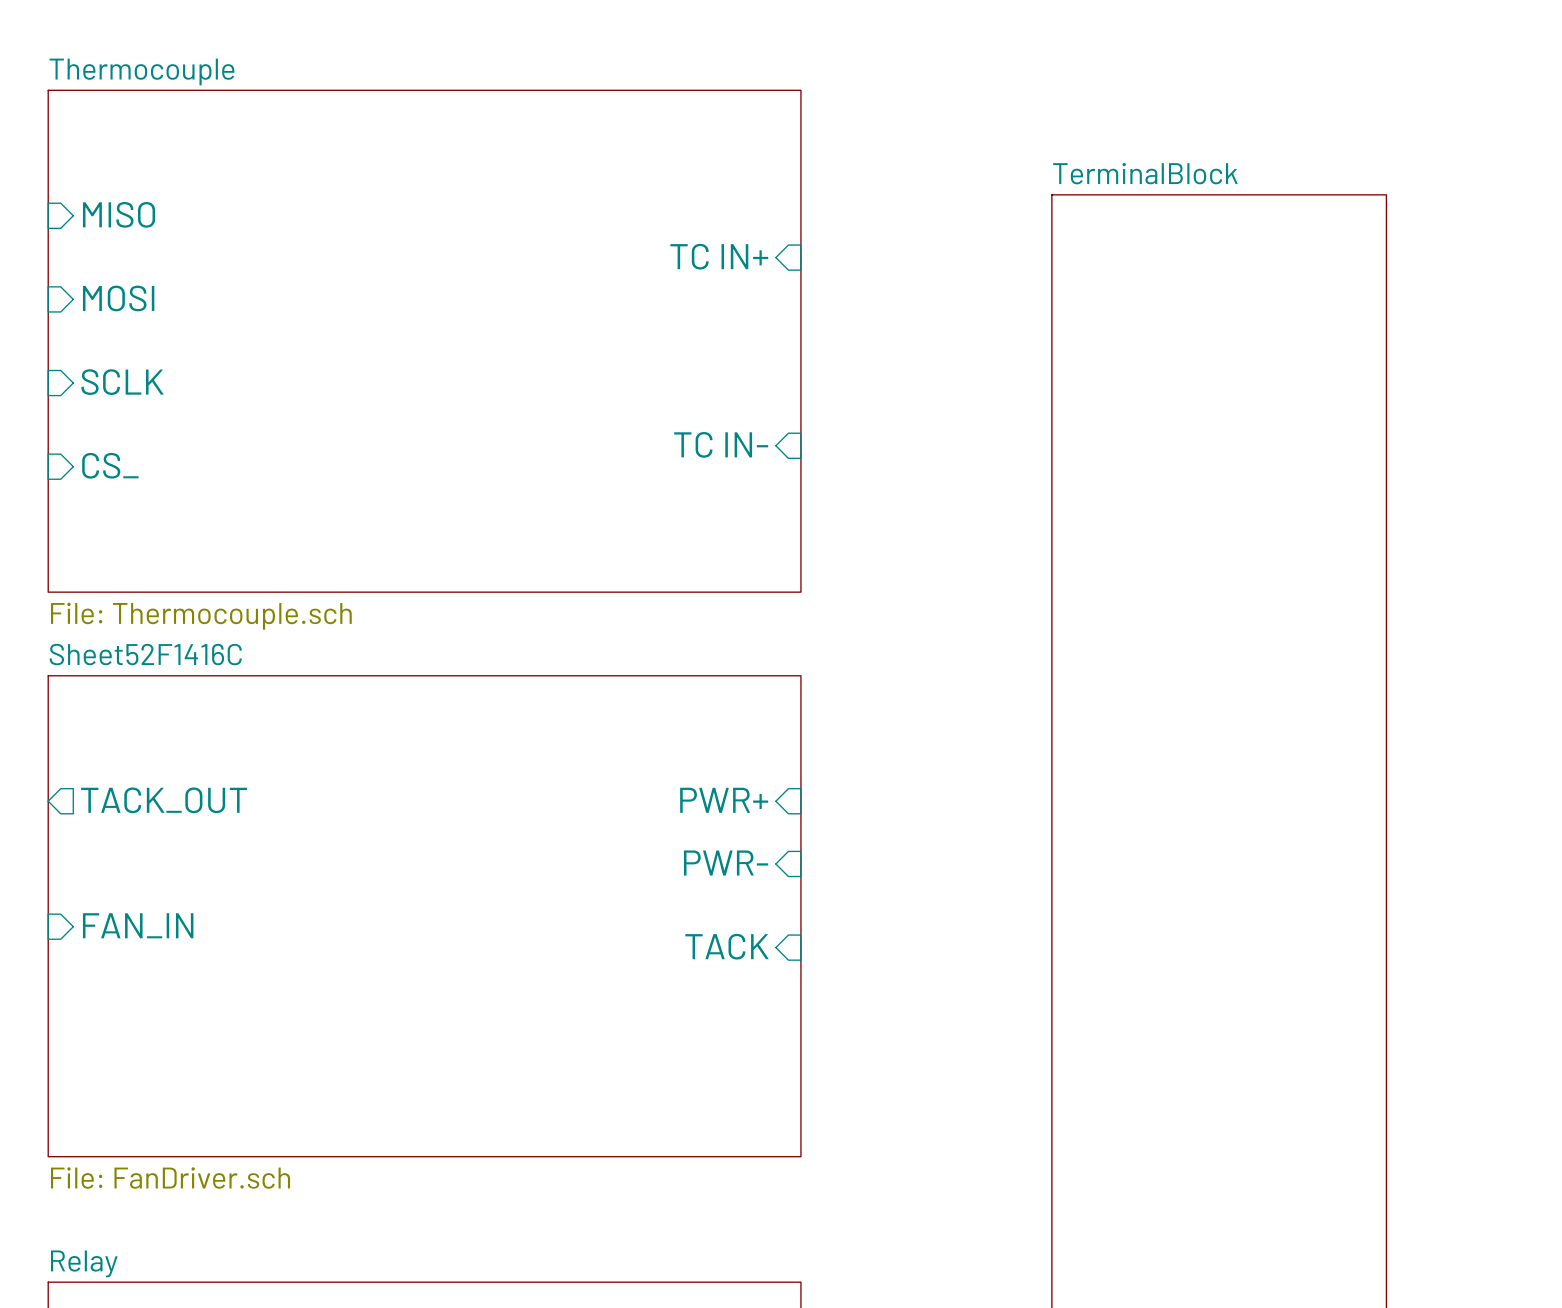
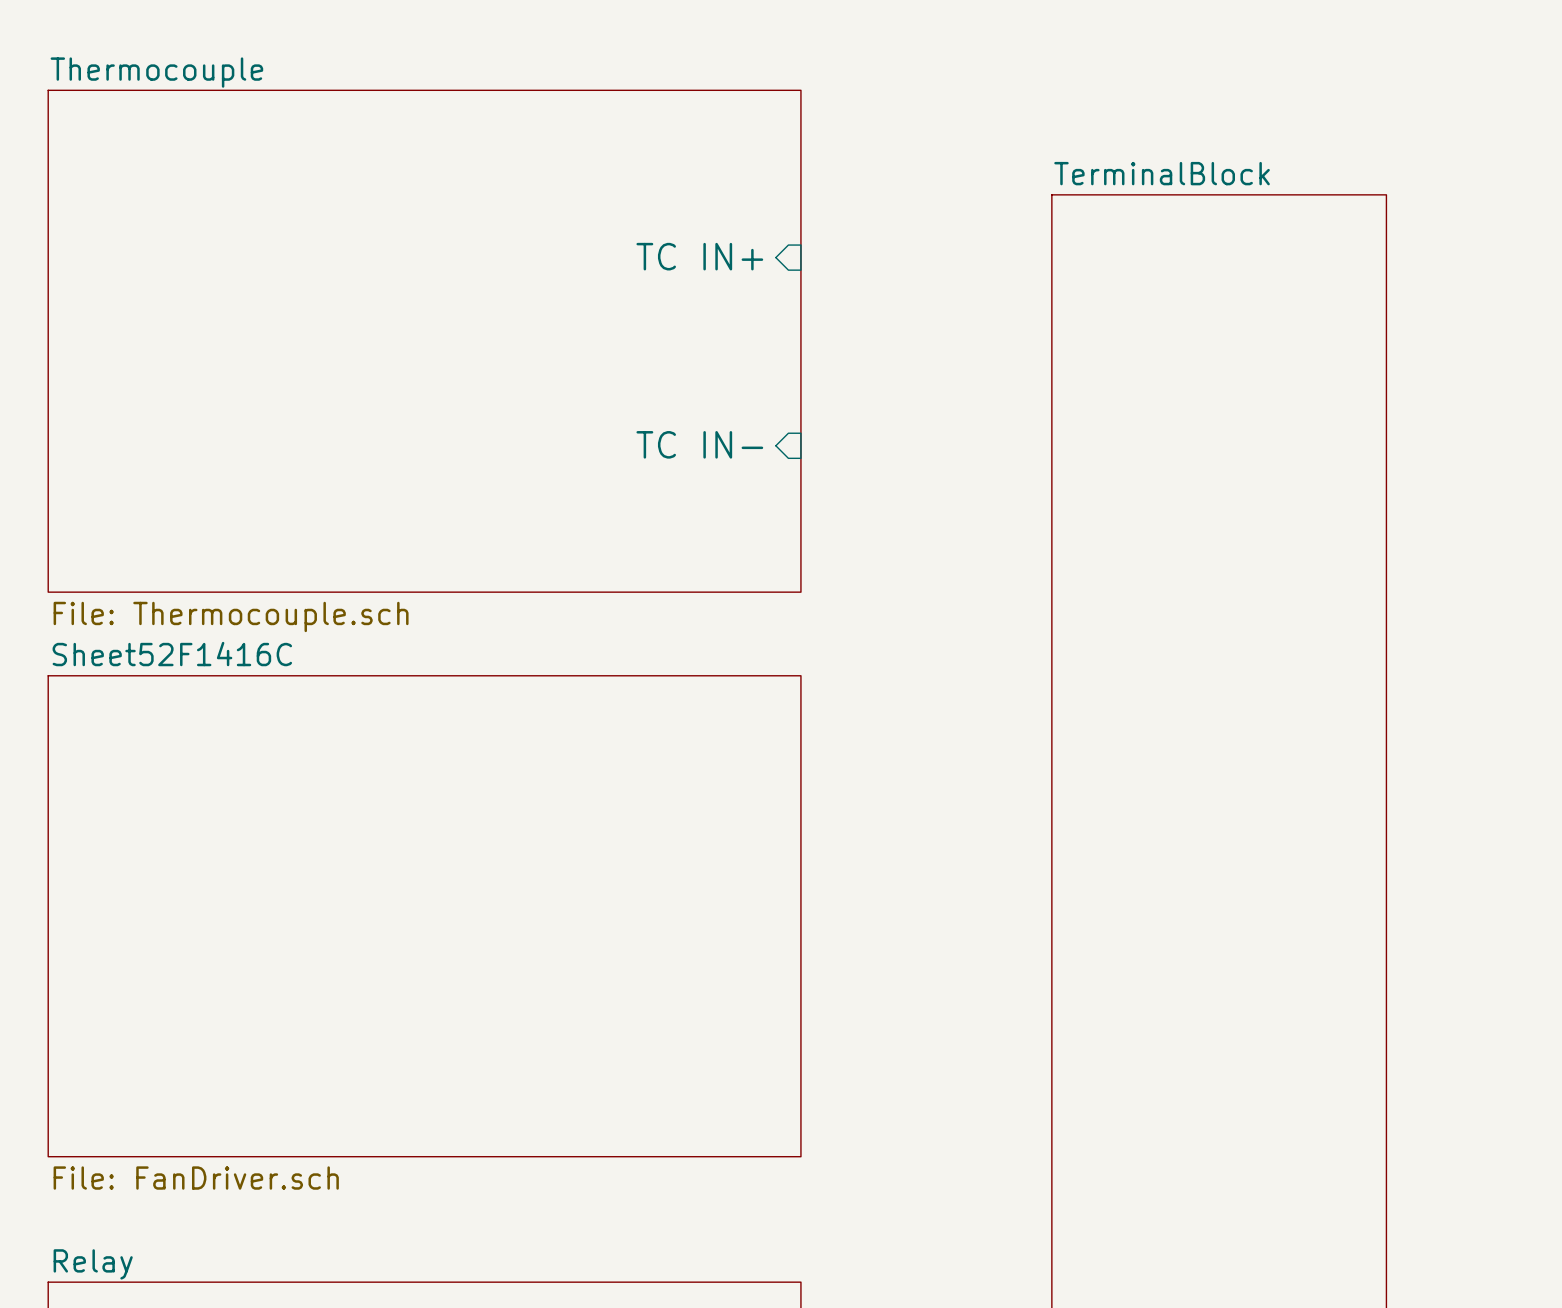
sheet pin: MISO (119, 214) -> none
sheet pin: MOSI (118, 298) -> none
sheet pin: SCLK (122, 382) -> none
sheet pin: CS_ (110, 465) -> none
sheet pin: TACK_OUT (164, 800) -> none
sheet pin: PWR+ (724, 800) -> none
sheet pin: PWR- (726, 863) -> none
sheet pin: FAN_IN (138, 925) -> none
sheet pin: TACK (726, 946) -> none

